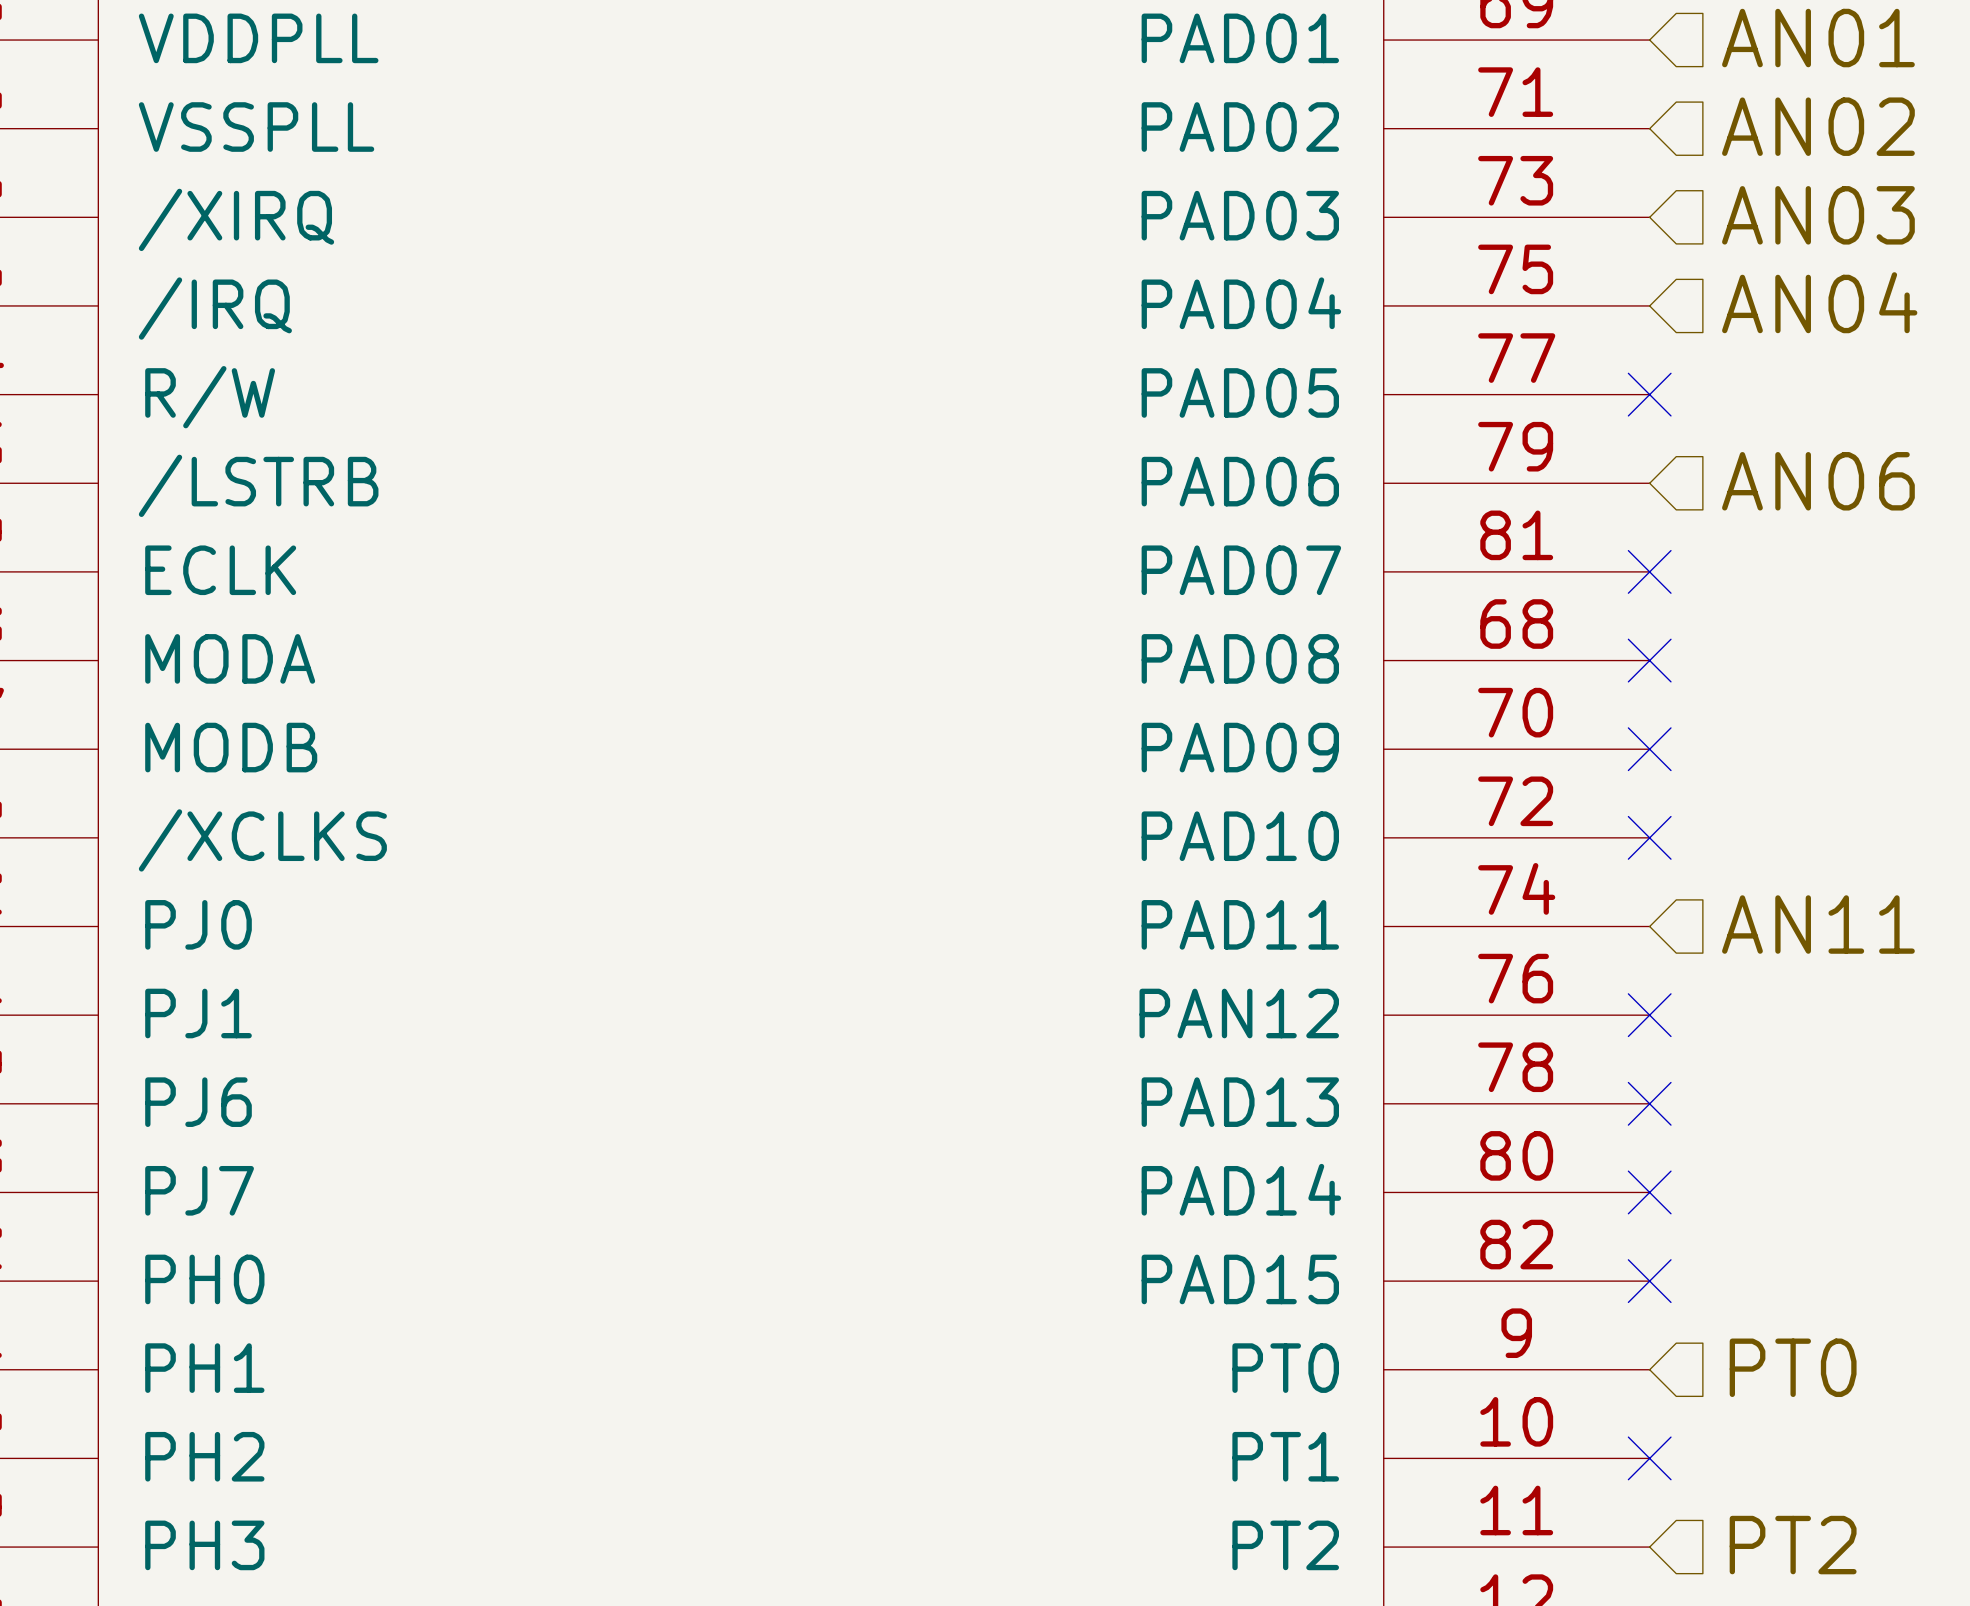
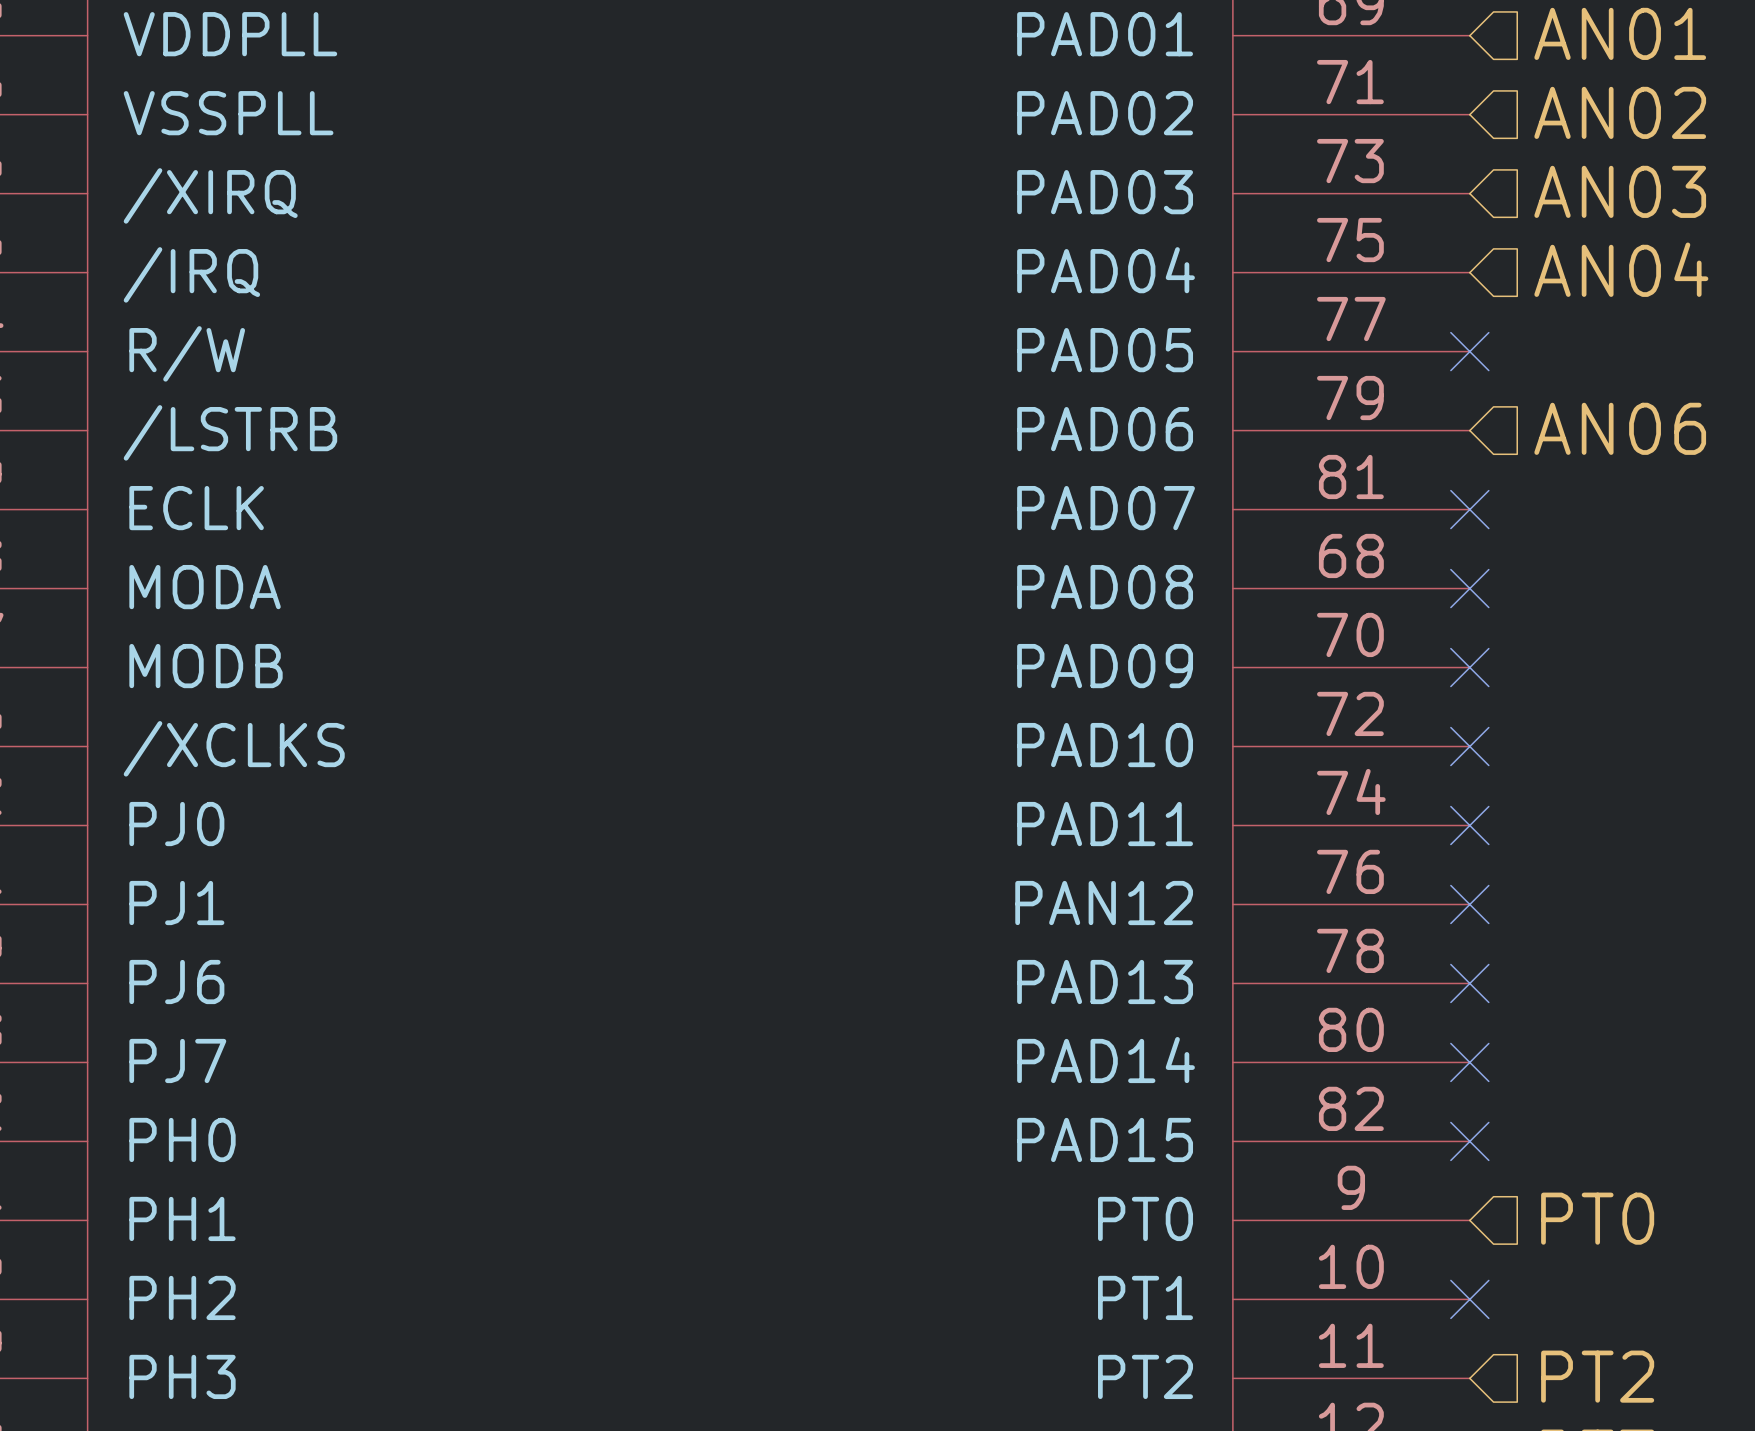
hierarchical label: AN11 (1818, 924) -> none
no-connect mark: none -> (1469, 825)

